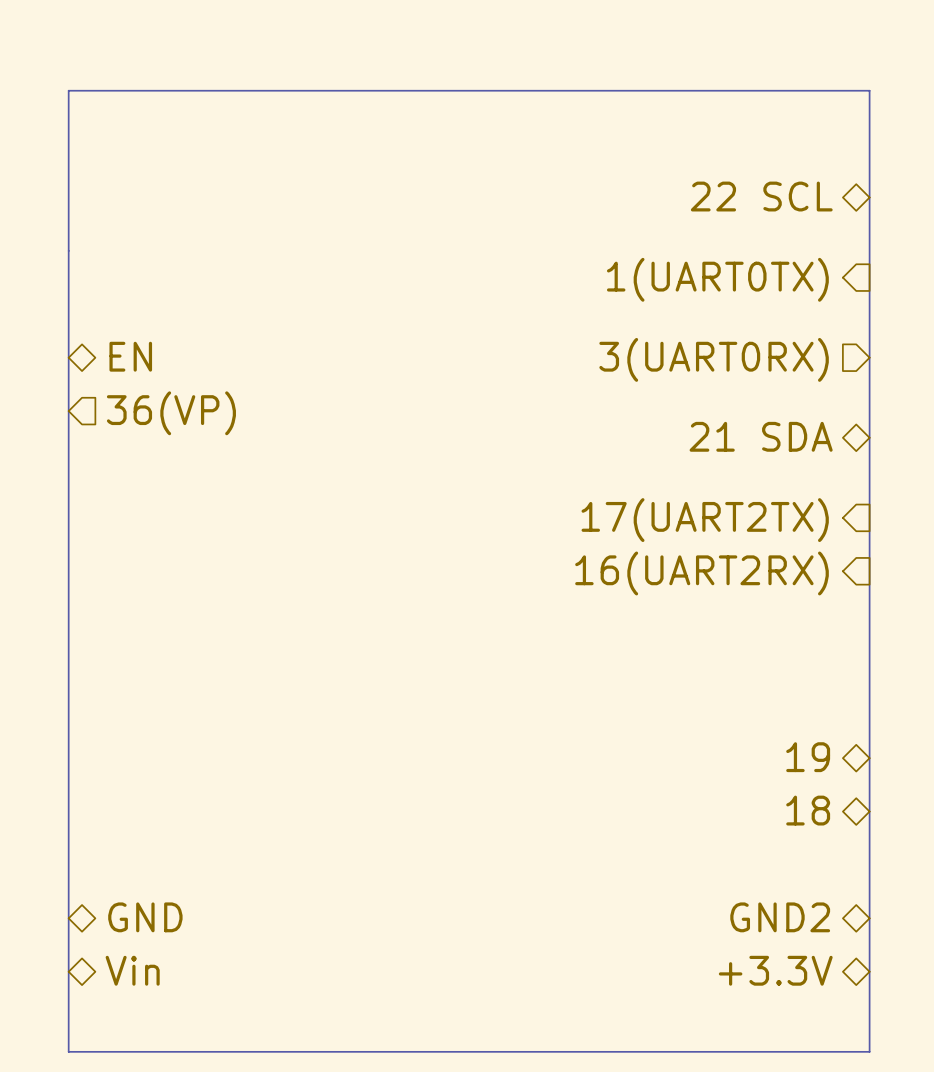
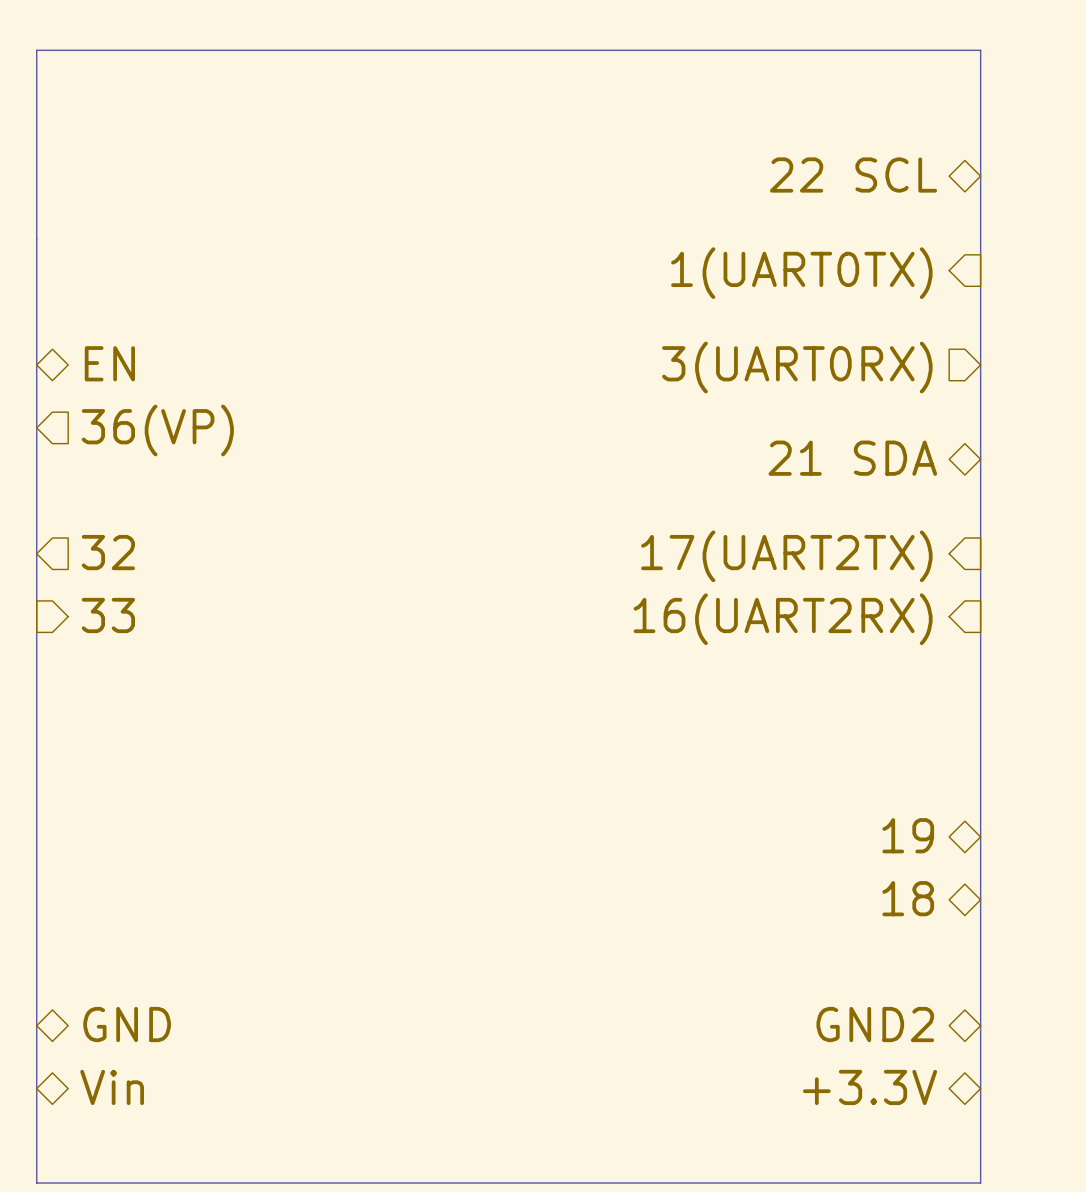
hierarchical label: none -> 32 (108, 552)
hierarchical label: none -> 33 (108, 615)

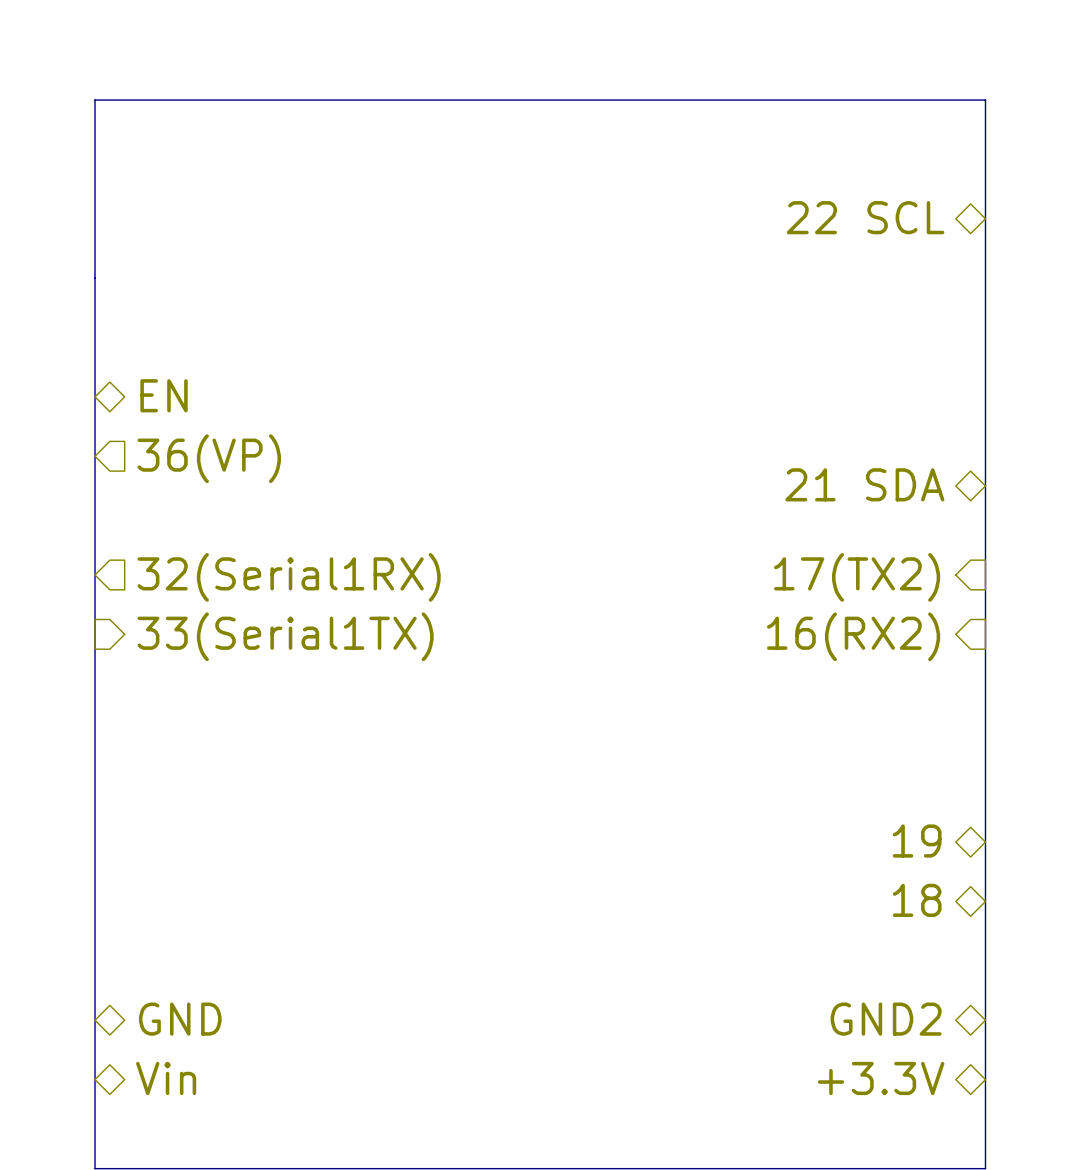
hierarchical label: 1(UART0TX) (801, 273) -> none
hierarchical label: 3(UART0RX) (797, 367) -> none
hierarchical label: 32 (108, 552) -> 32(Serial1RX) (289, 577)
hierarchical label: 17(UART2TX) (786, 556) -> 17(TX2) (857, 577)
hierarchical label: 33 (108, 615) -> 33(Serial1TX) (285, 636)
hierarchical label: 16(UART2RX) (783, 619) -> 16(RX2) (853, 636)

